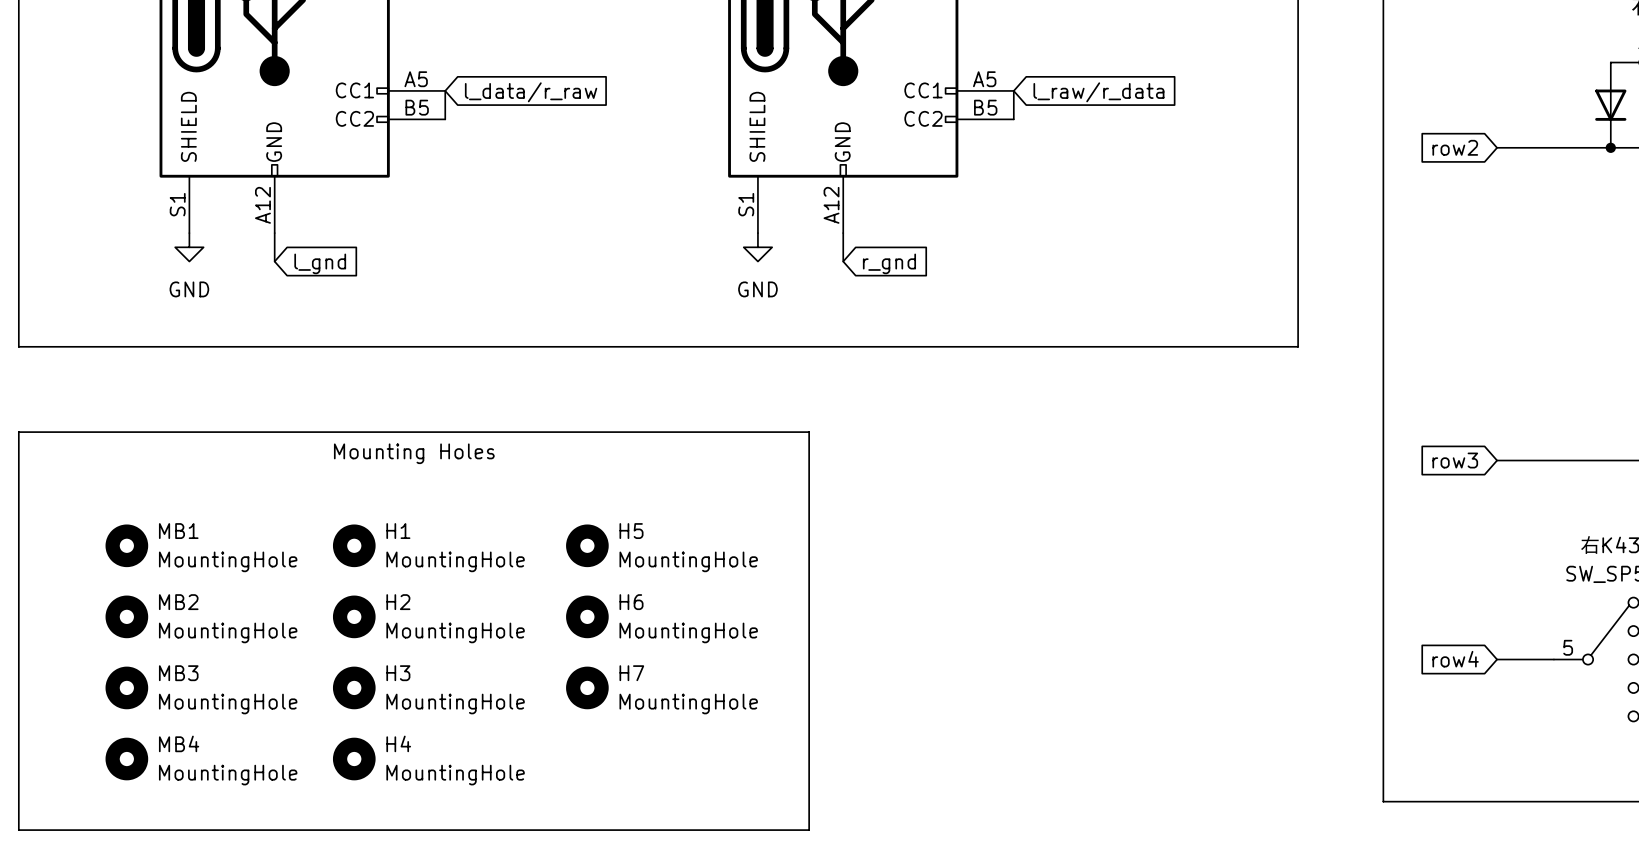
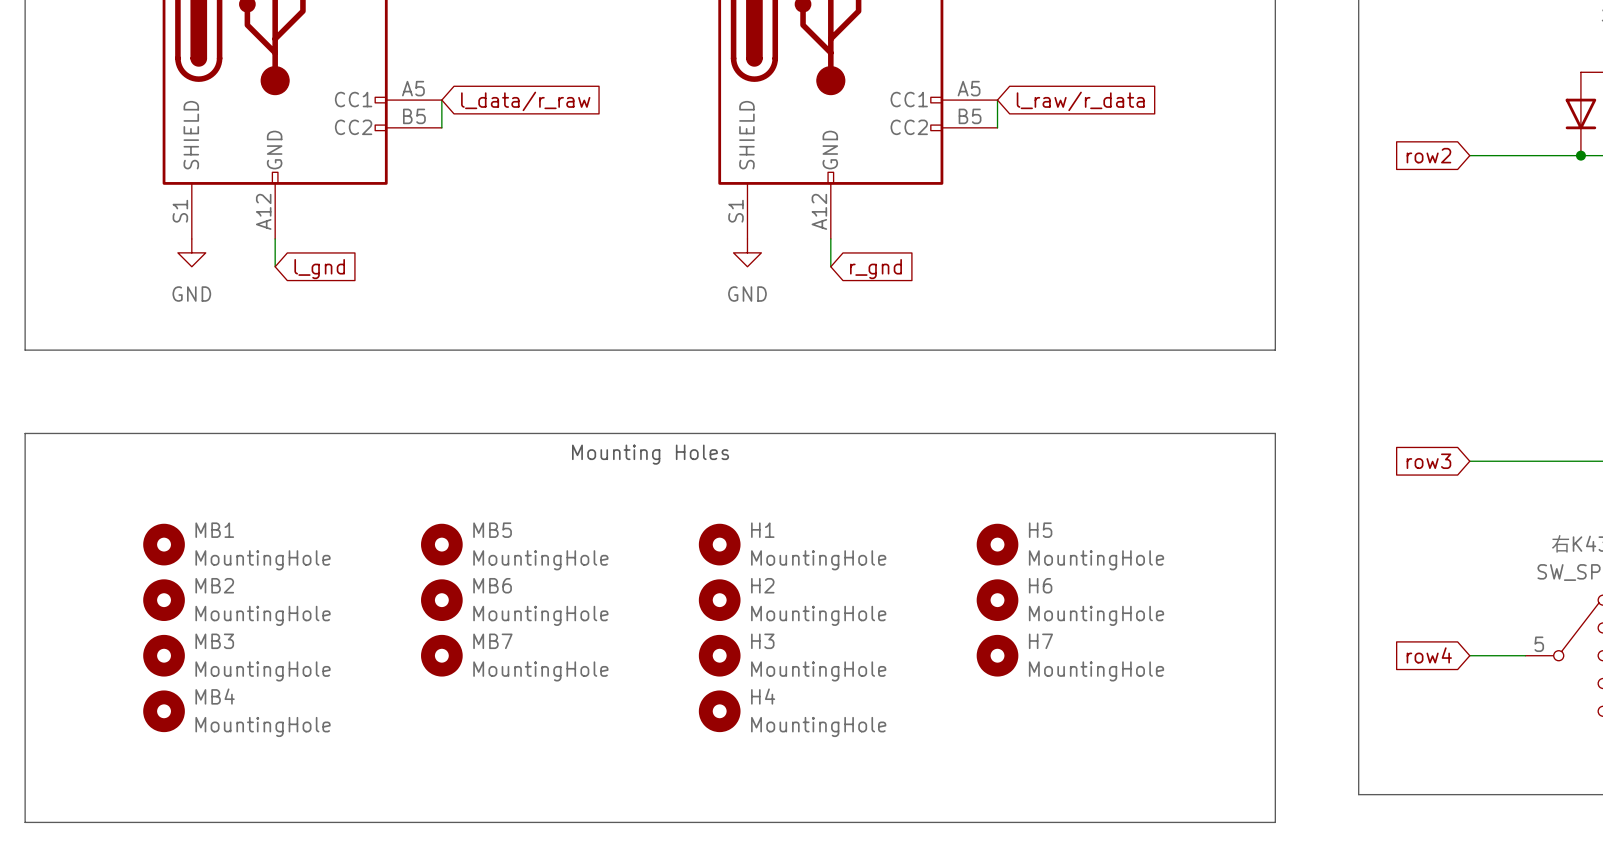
line: (809, 432) (809, 830) -> (797, 433) (1275, 433) (1275, 822) (797, 822)
text position: Mounting Holes (414, 453) -> Mounting Holes (650, 454)
MB1 position: (126, 545) -> (164, 544)
H1 position: (354, 545) -> (719, 544)
MB5: none -> MountingHole (441, 544)
H5 position: (587, 545) -> (997, 544)
MB6: none -> MountingHole (441, 600)
MB2 position: (126, 616) -> (164, 600)
H2 position: (354, 616) -> (719, 600)
H6 position: (587, 616) -> (997, 600)
MB7: none -> MountingHole (441, 655)
MB3 position: (126, 687) -> (164, 655)
H3 position: (354, 687) -> (719, 655)
H7 position: (587, 687) -> (997, 655)
MB4 position: (126, 759) -> (164, 711)
H4 position: (354, 759) -> (719, 711)

